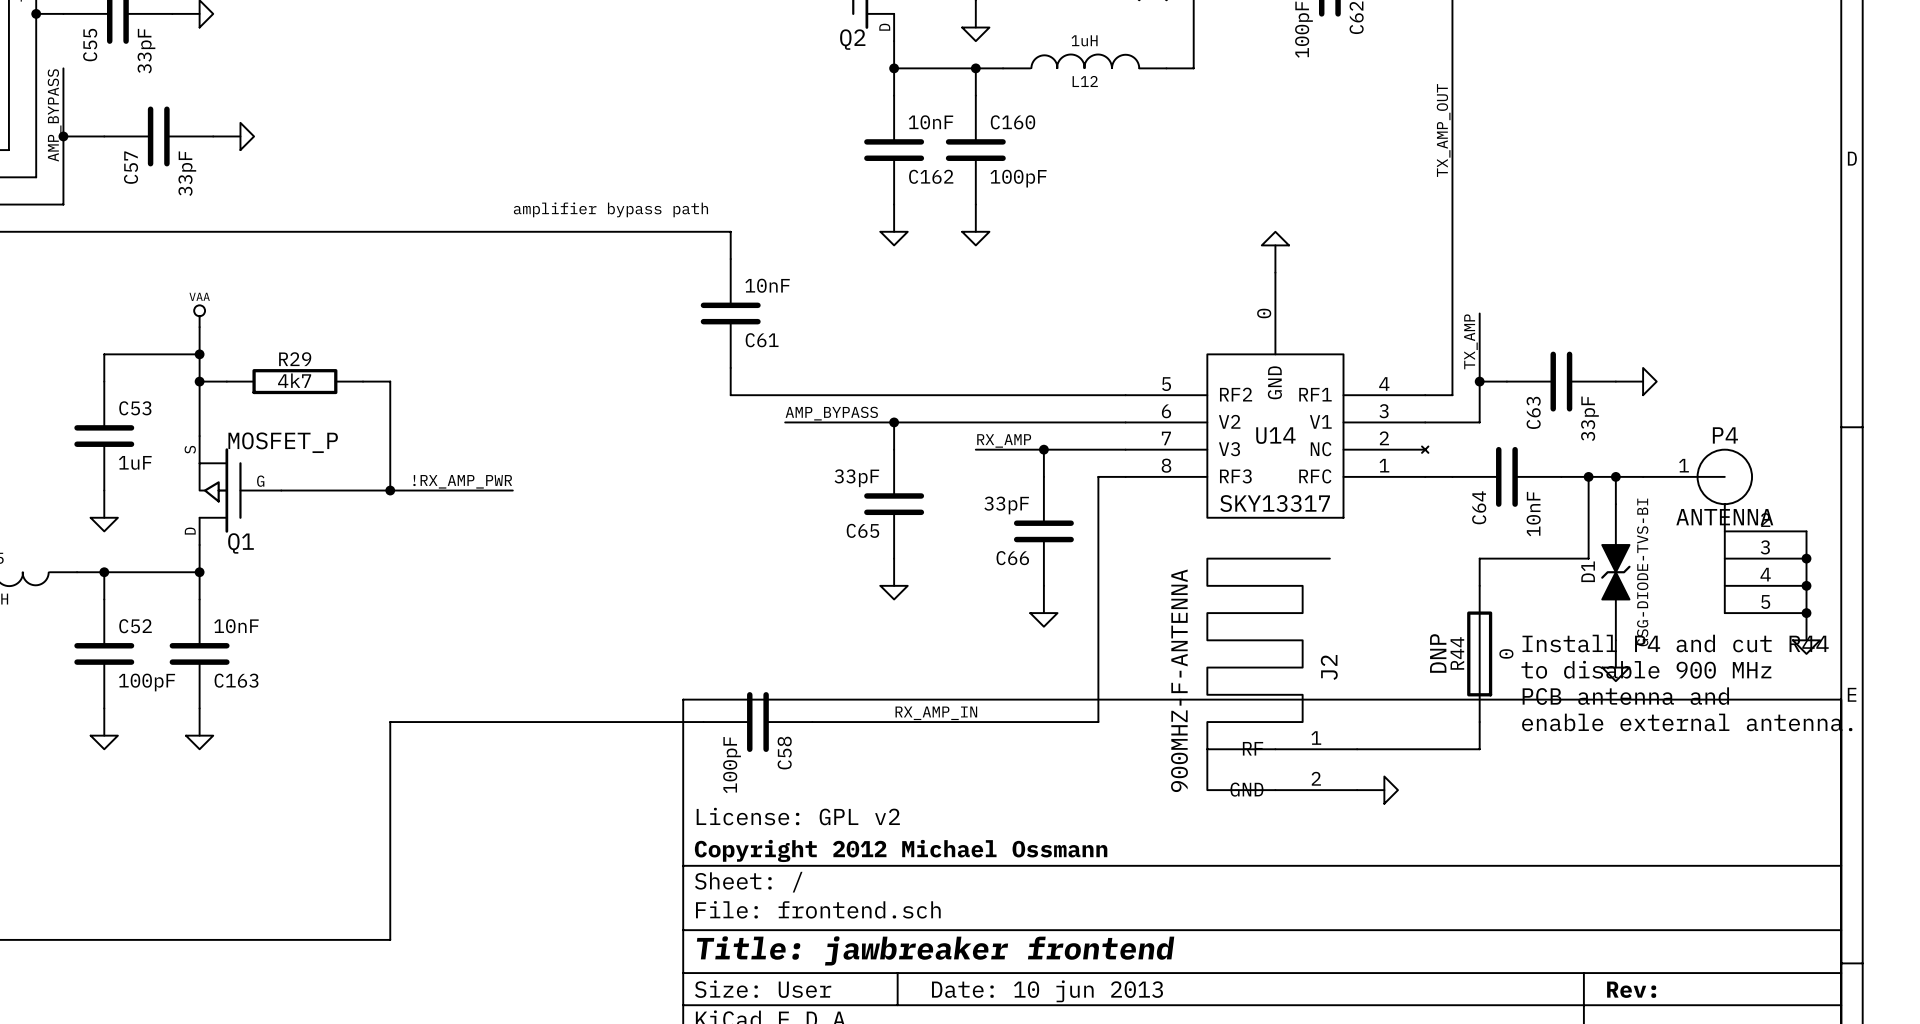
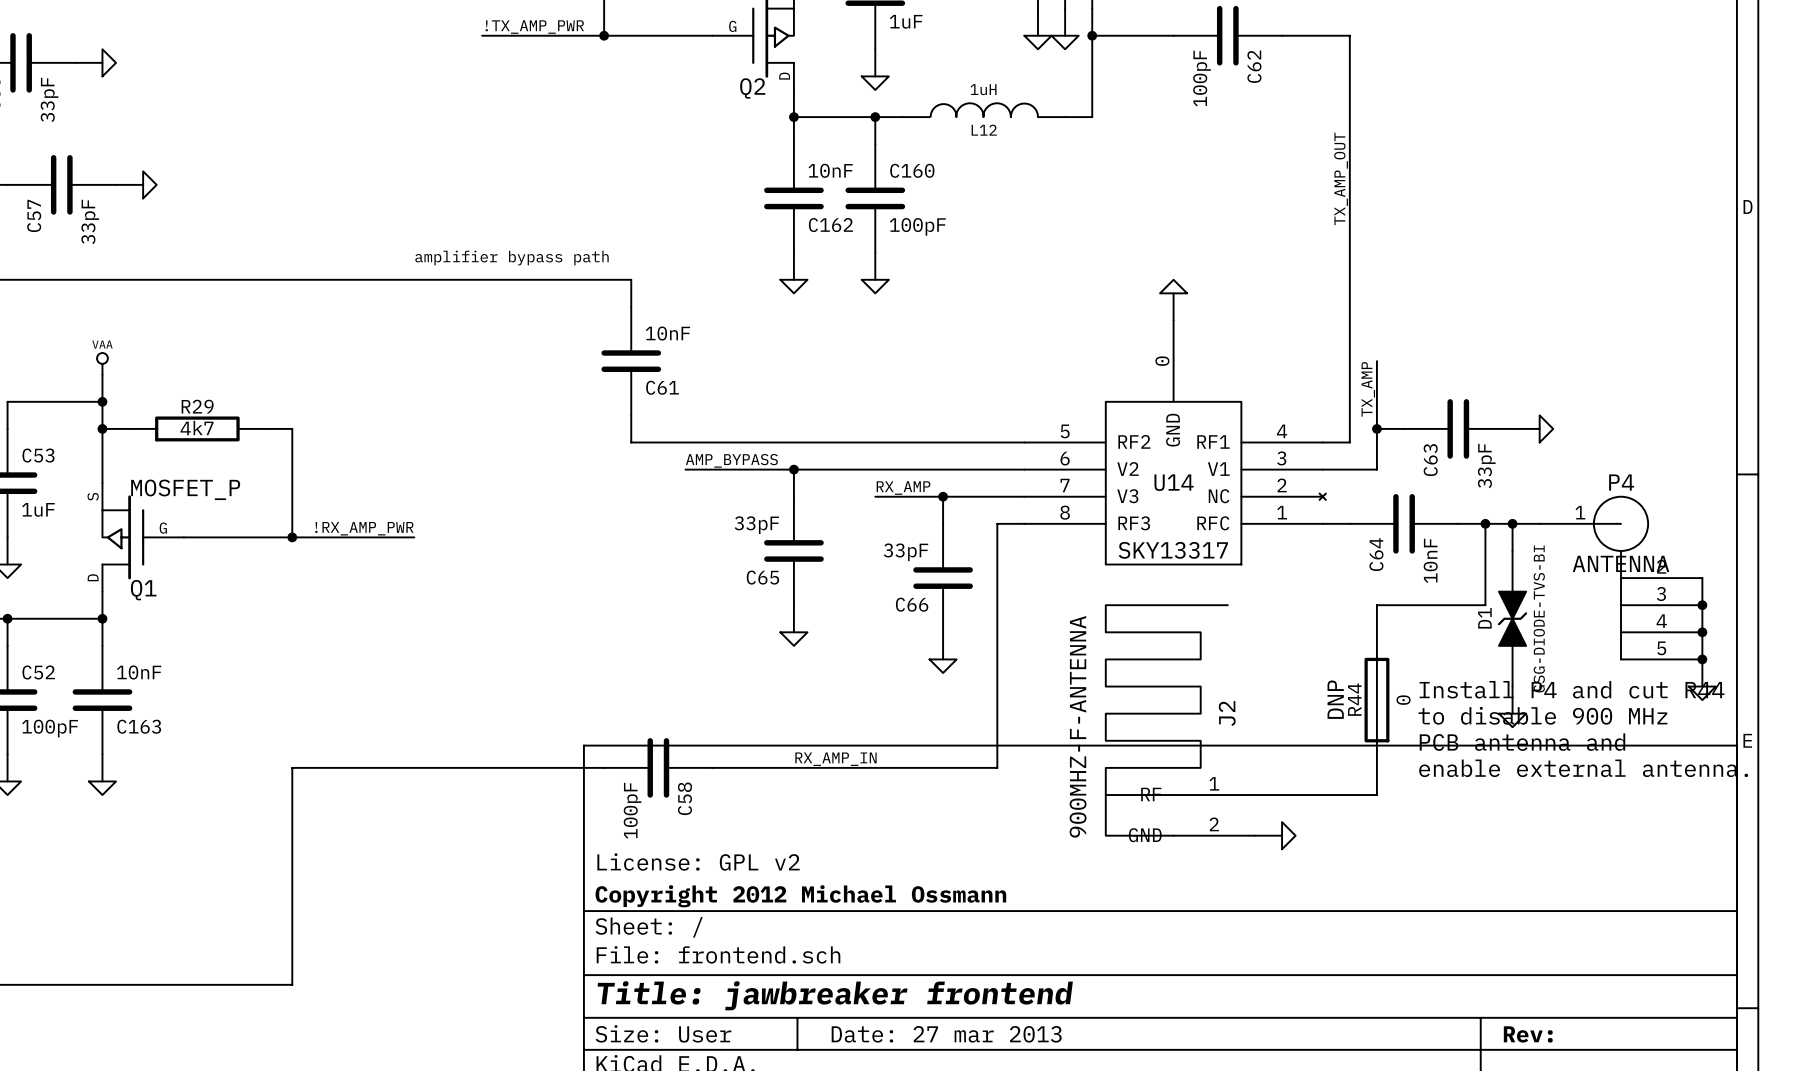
title block: Date: 10 jun 2013 (1047, 991) -> Date: 27 mar 2013 (946, 1034)

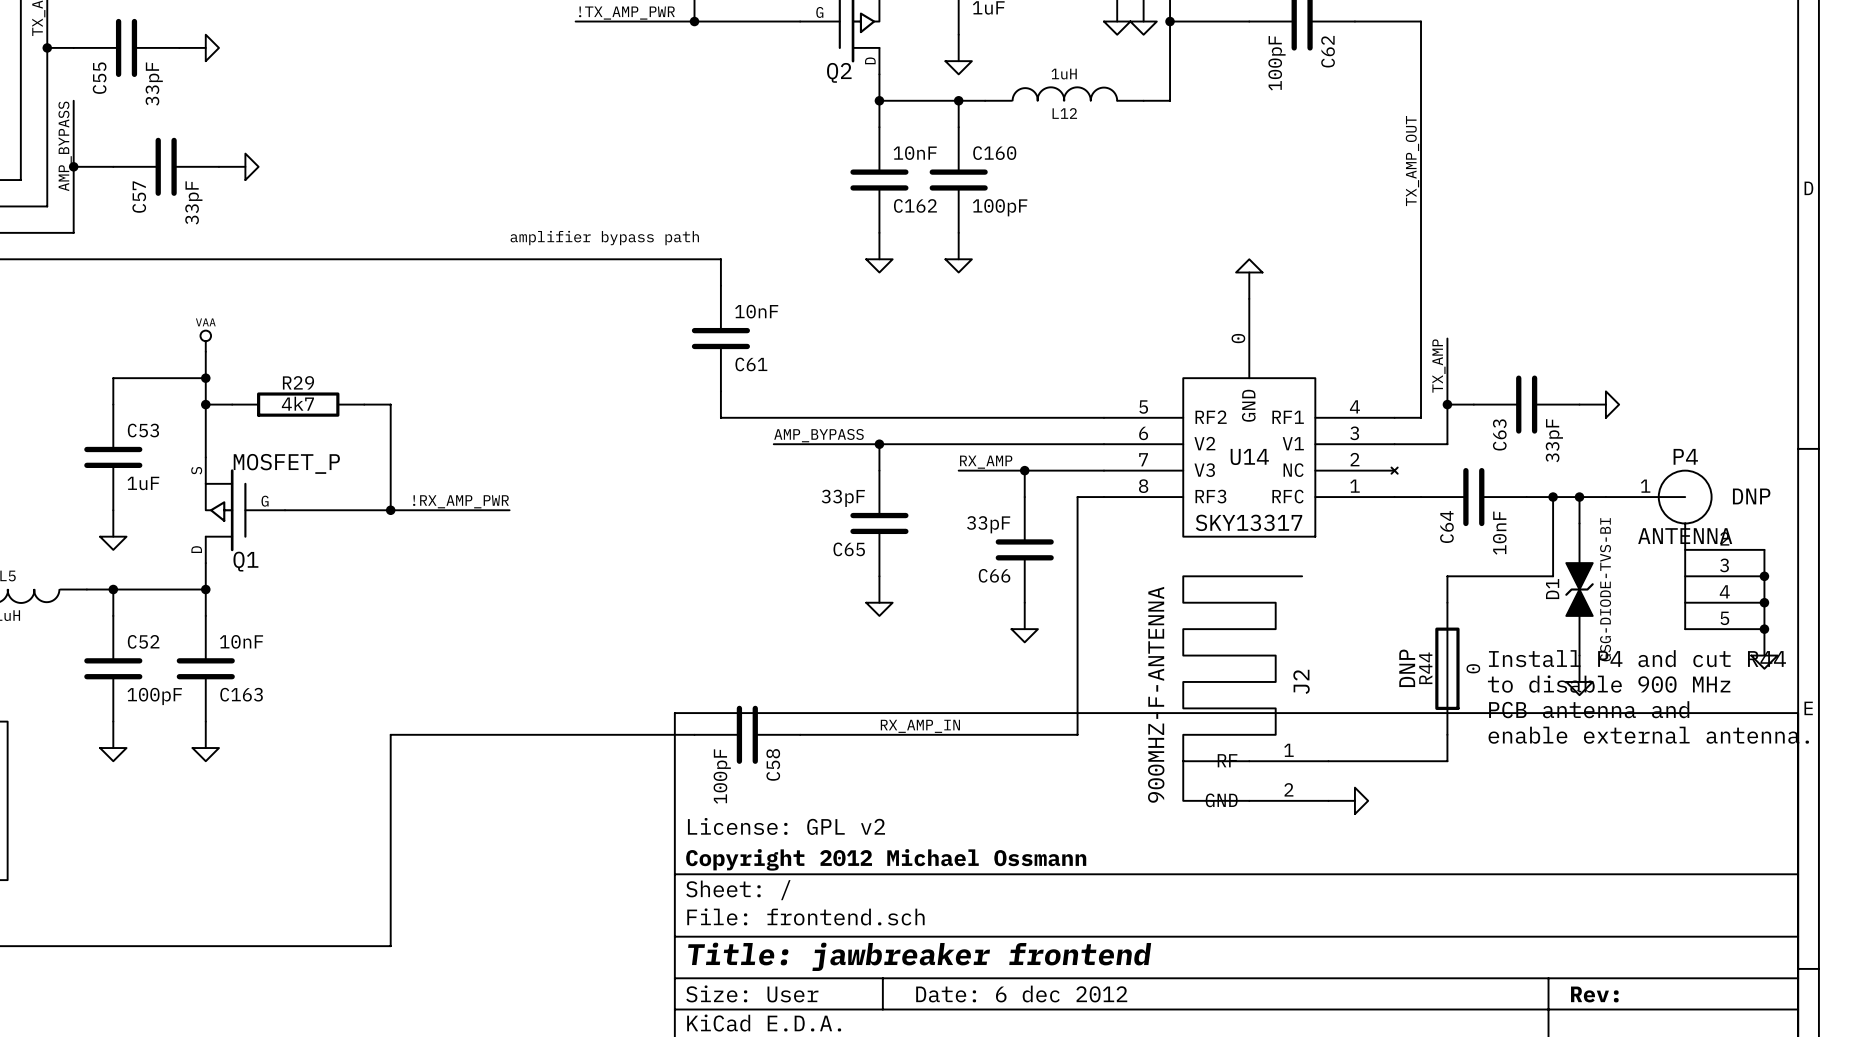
P4 text: none -> DNP (1751, 496)
title block: Date: 27 mar 2013 (946, 1034) -> Date: 6 dec 2012 (1021, 994)

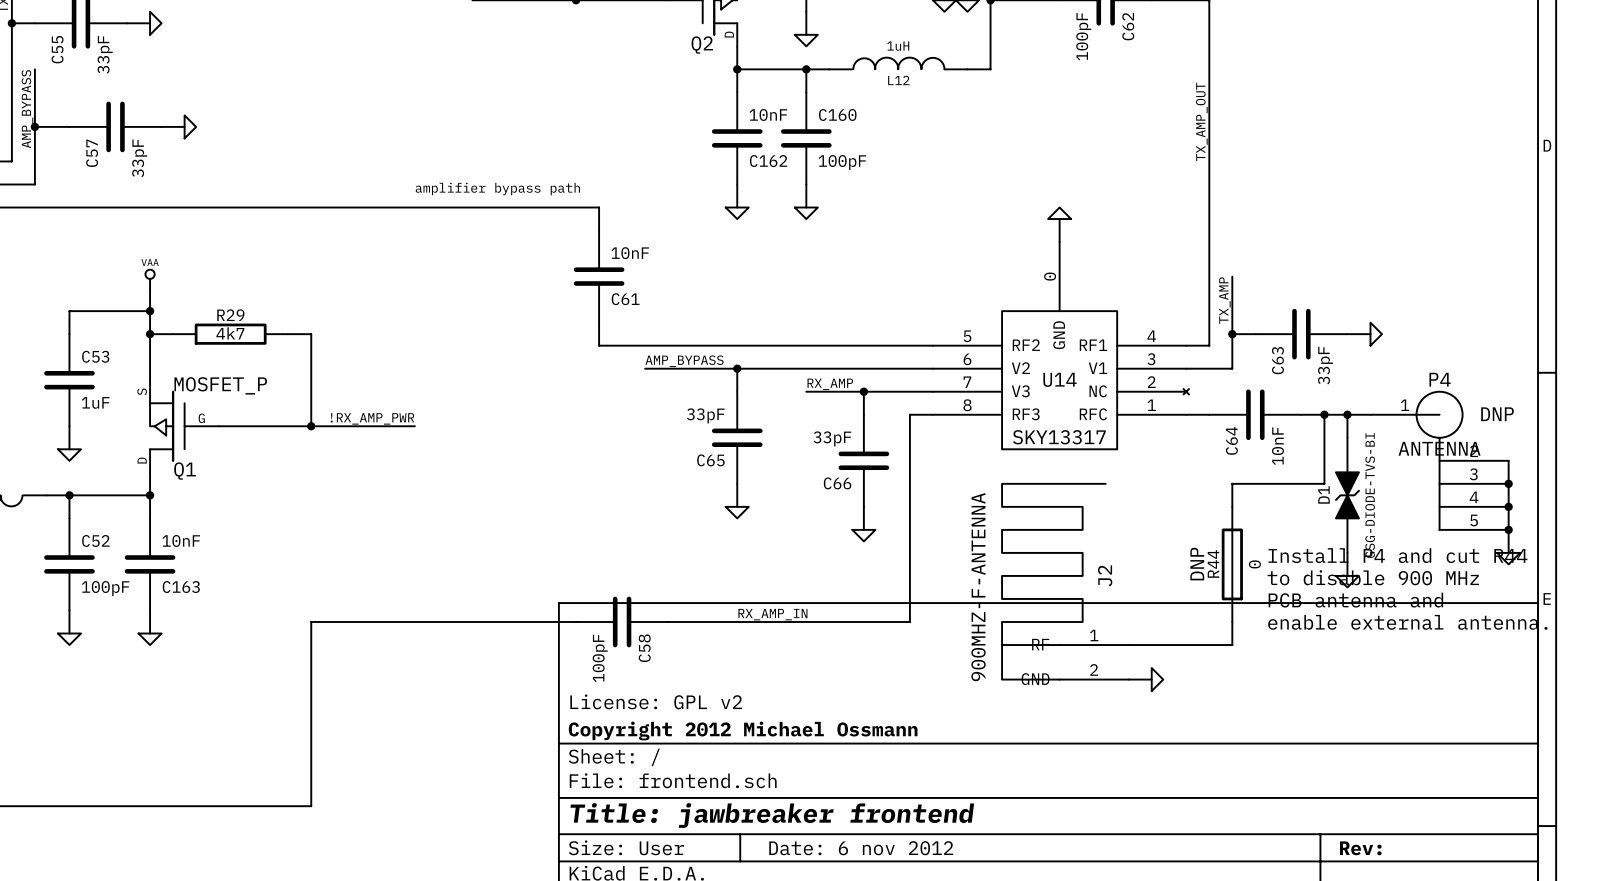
title block: Date: 6 dec 2012 (1021, 994) -> Date: 6 nov 2012 (861, 848)

